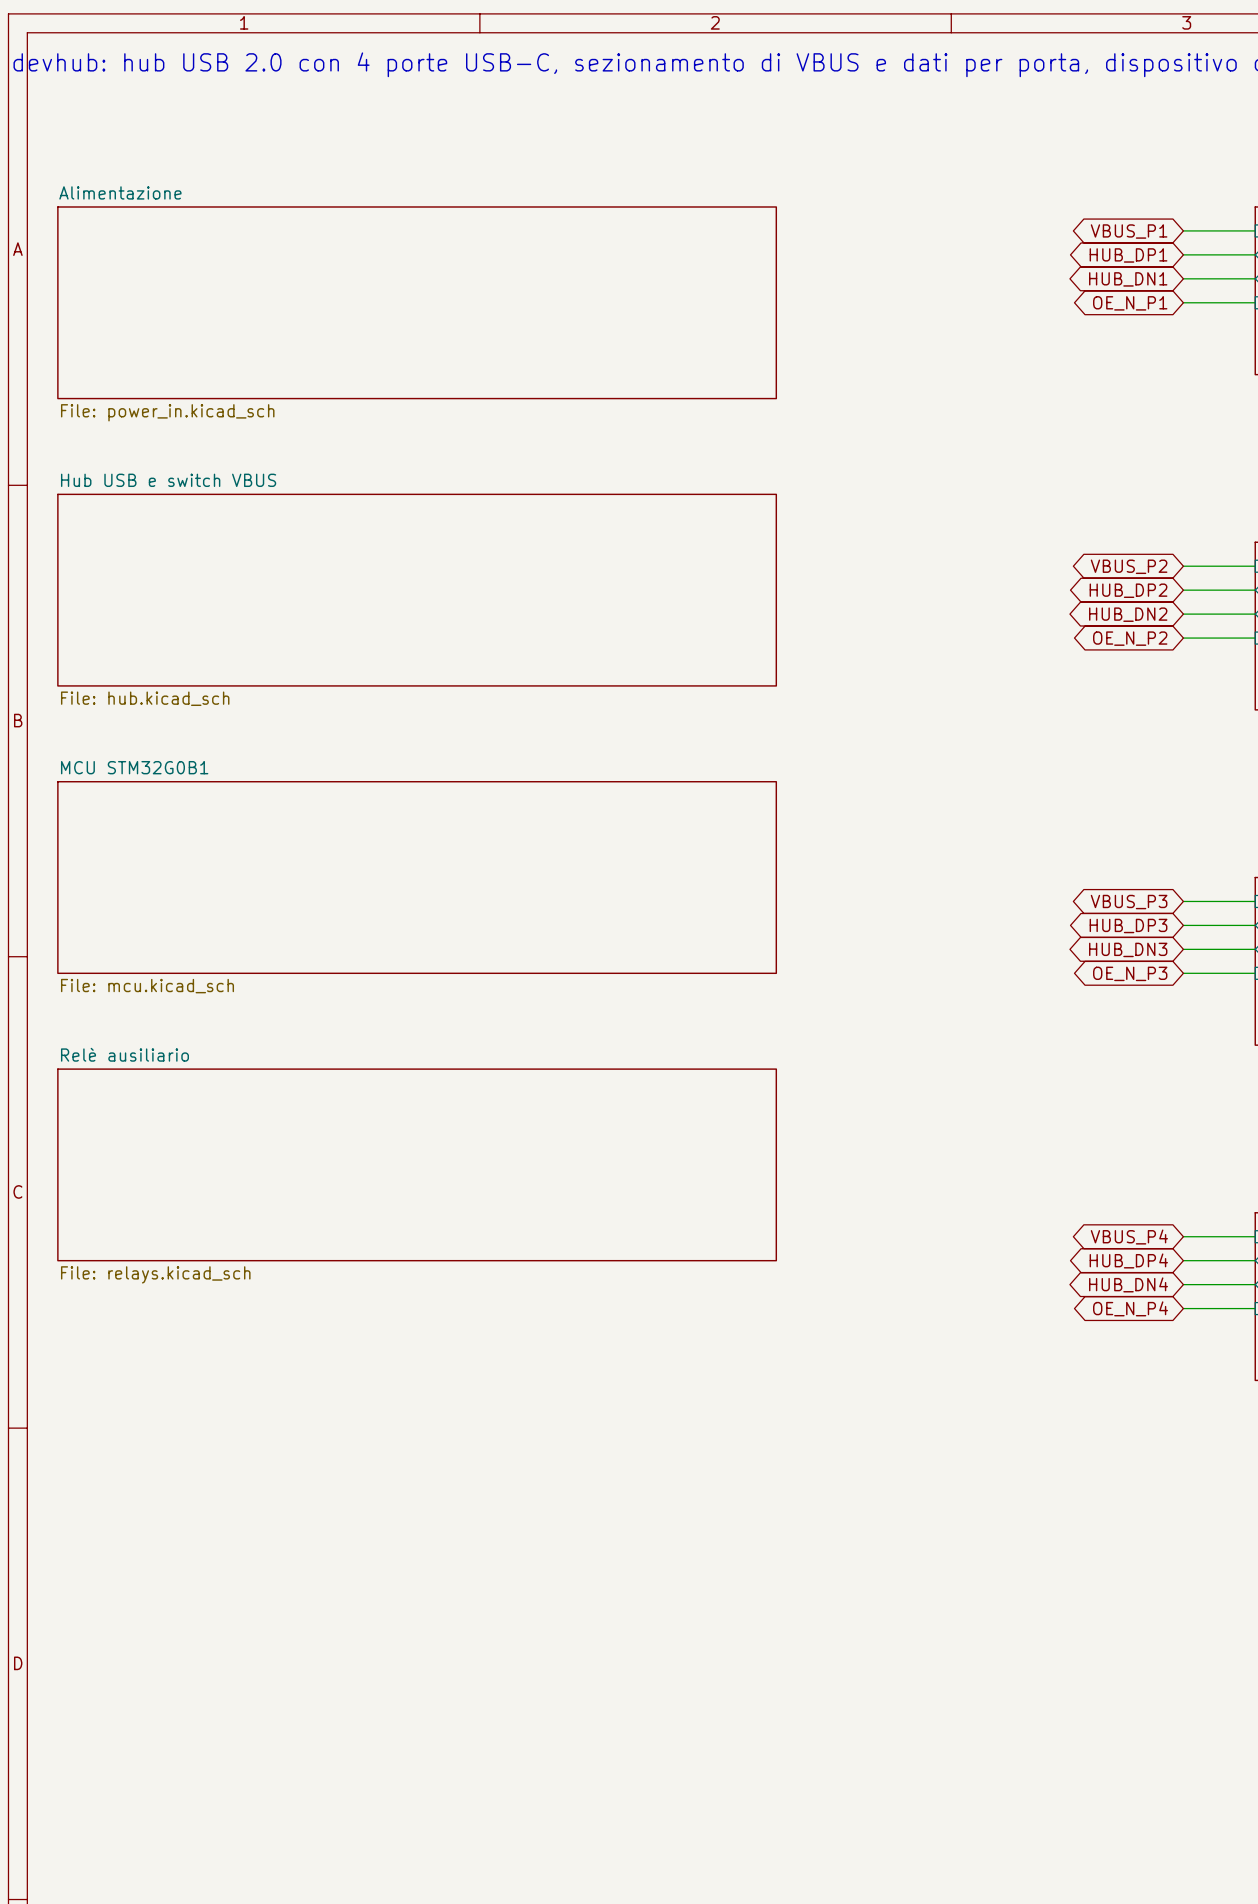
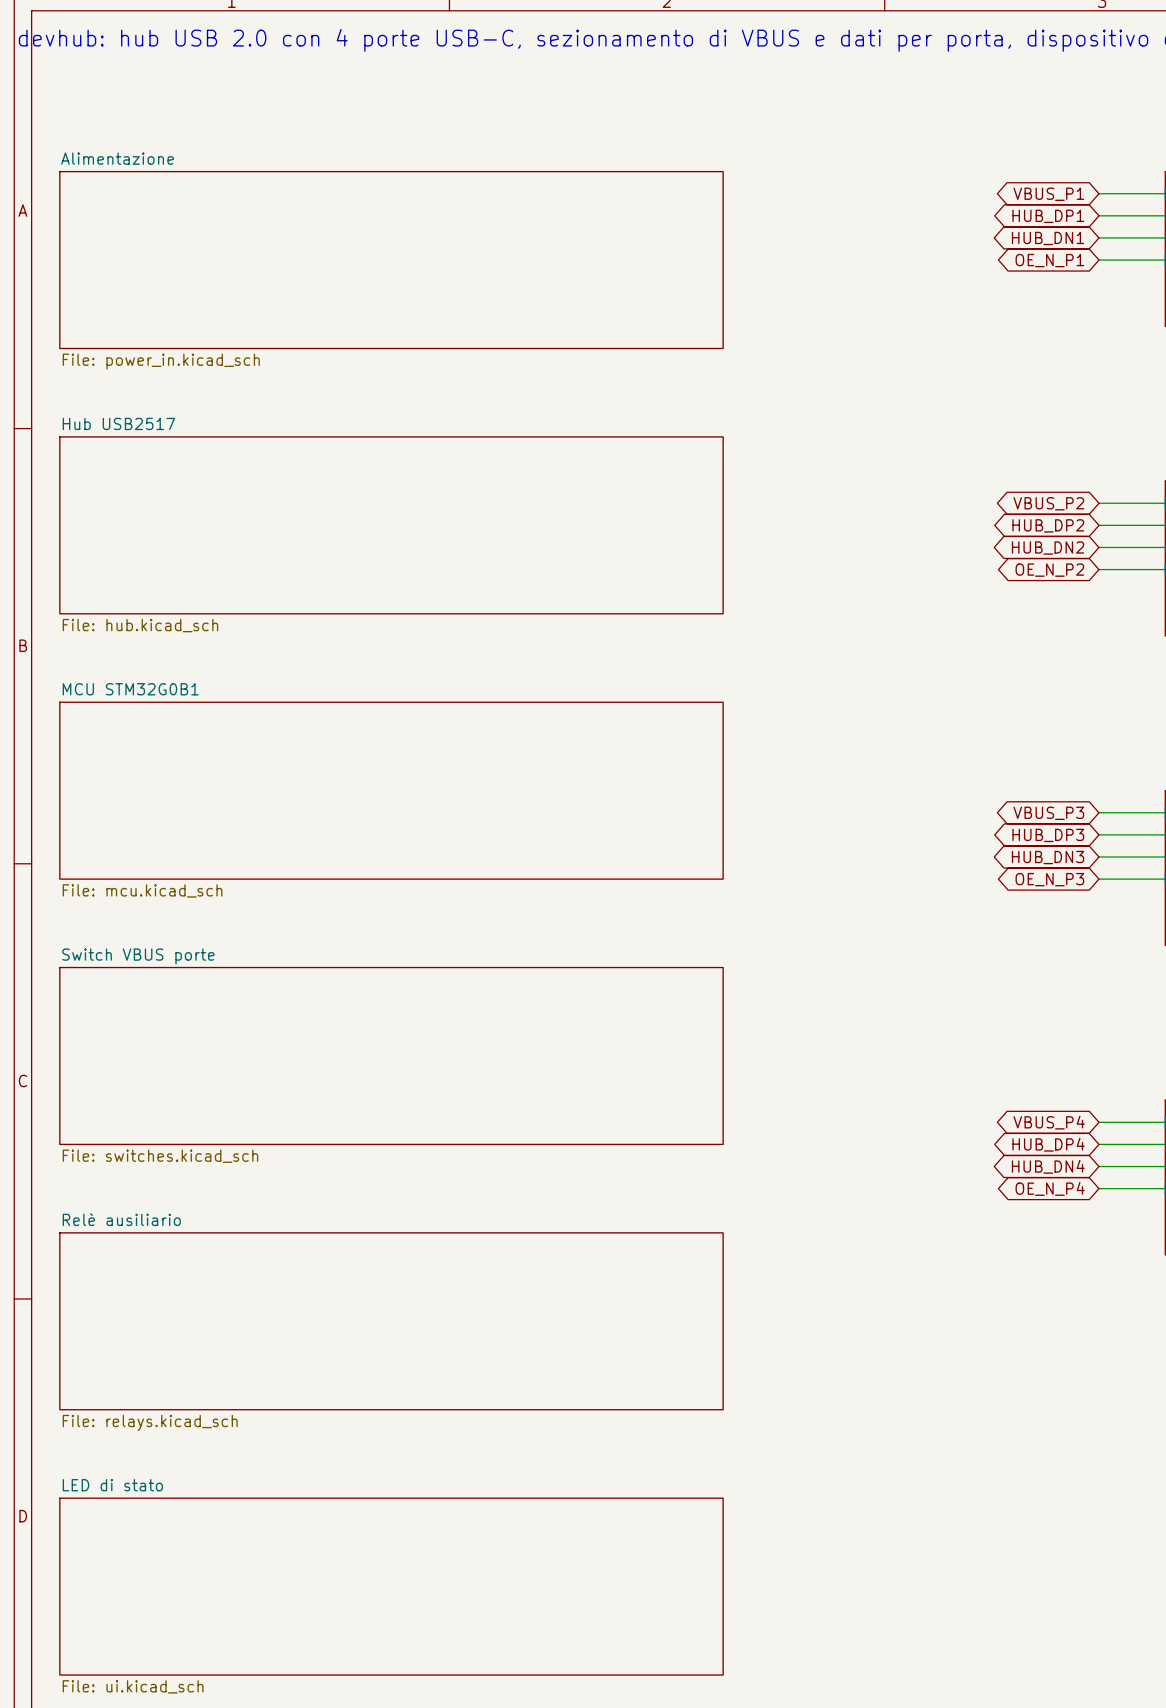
sheet Hub USB e switch VBUS name: Hub USB e switch VBUS (168, 480) -> Hub USB2517 (118, 423)
sheet Relè ausiliario name: Relè ausiliario (124, 1054) -> Switch VBUS porte (138, 956)
sheet Relè ausiliario value: File: relays.kicad_sch (155, 1274) -> File: switches.kicad_sch (160, 1156)
sheet Relè ausiliario: none -> File: relays.kicad_sch (391, 1321)
sheet LED di stato: none -> File: ui.kicad_sch (391, 1586)

